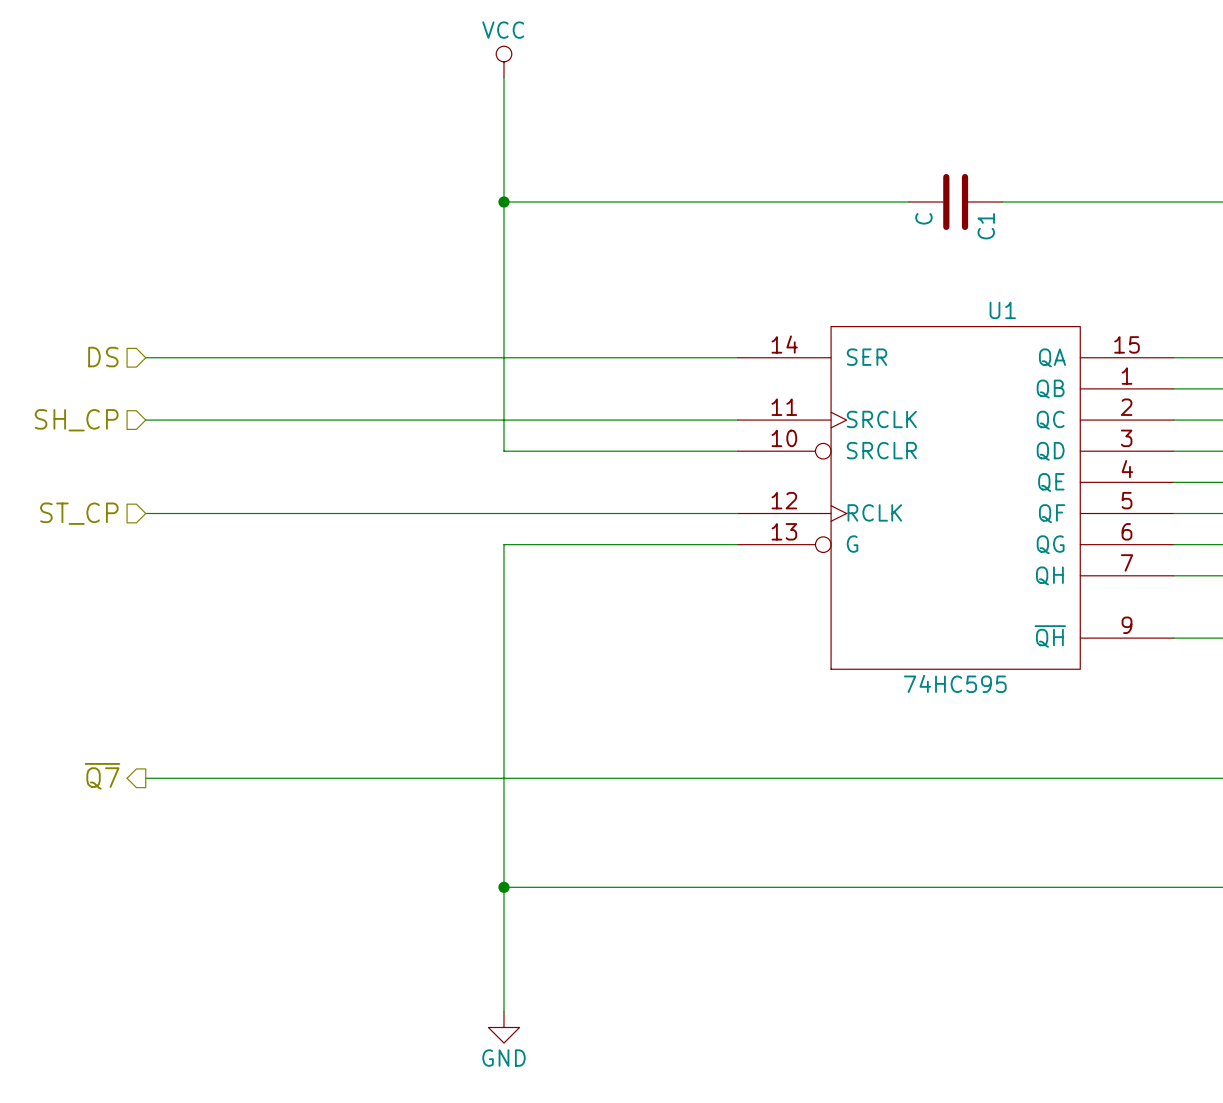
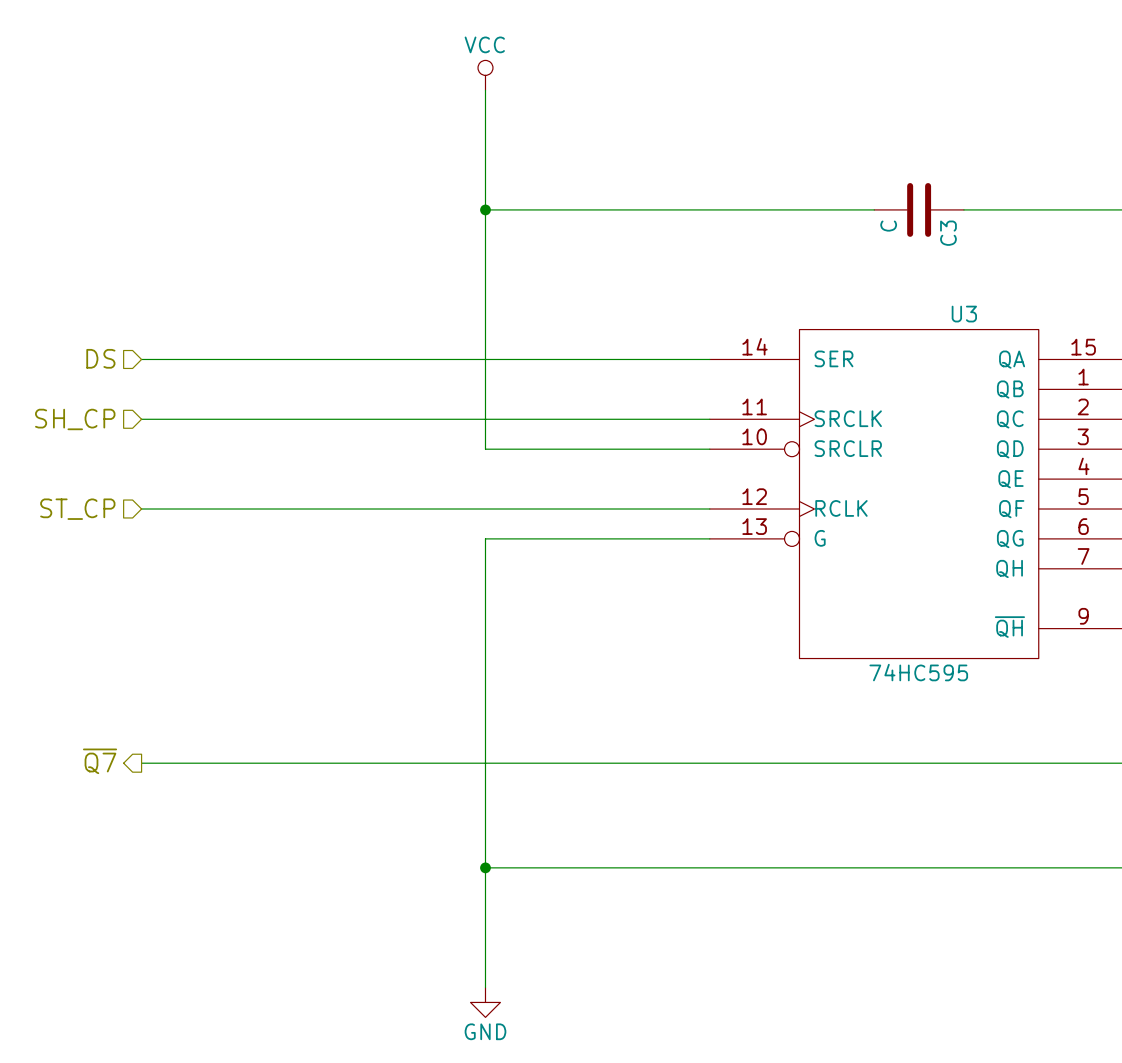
C1 name: C1 (986, 226) -> C3 (948, 233)
U1 name: U1 (1002, 310) -> U3 (964, 314)

